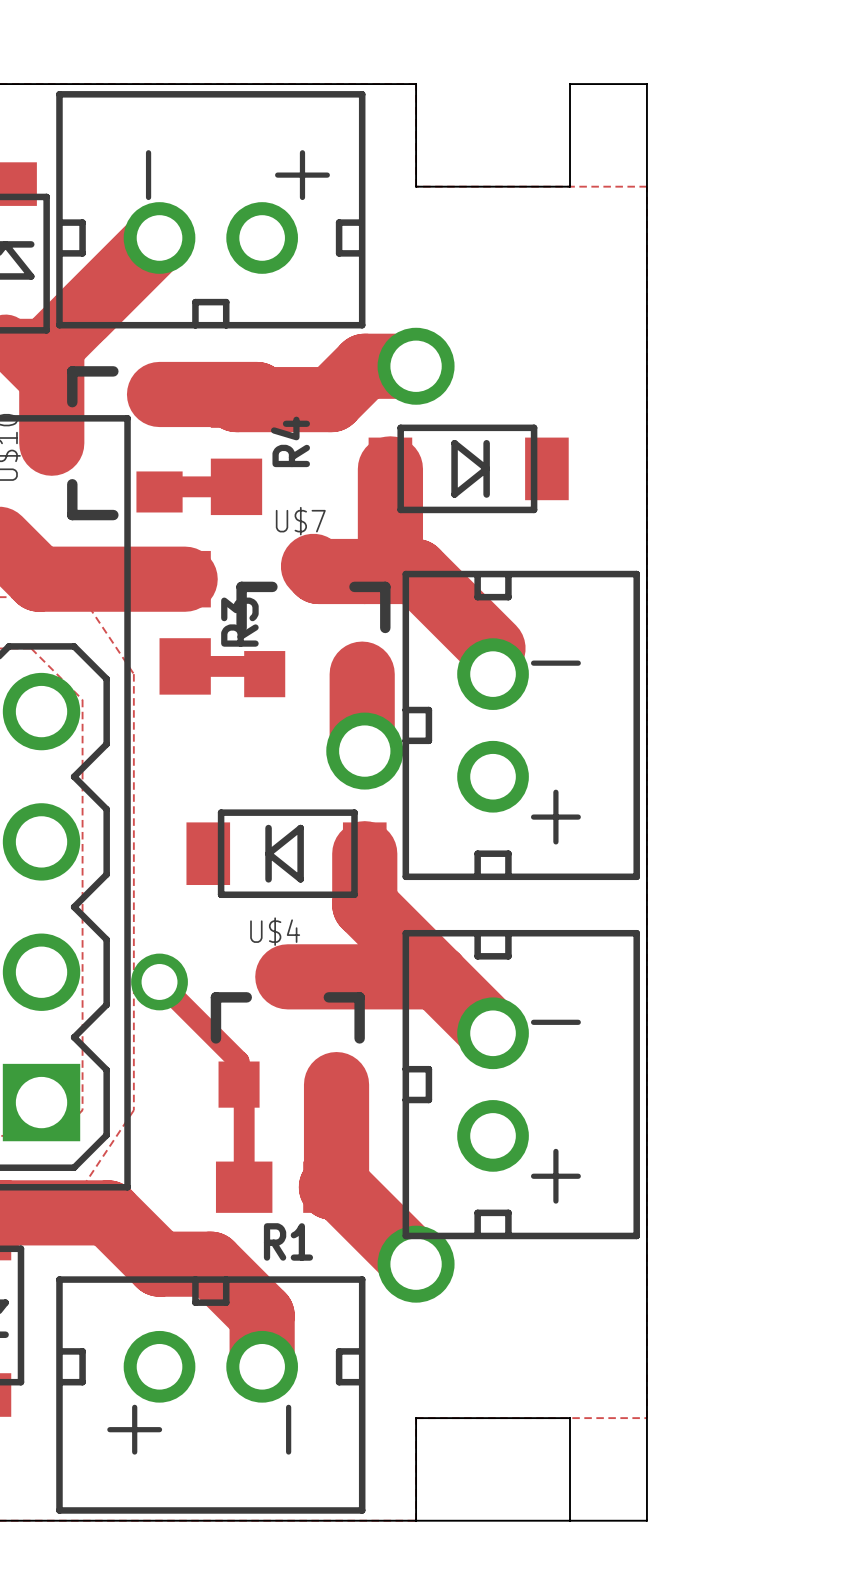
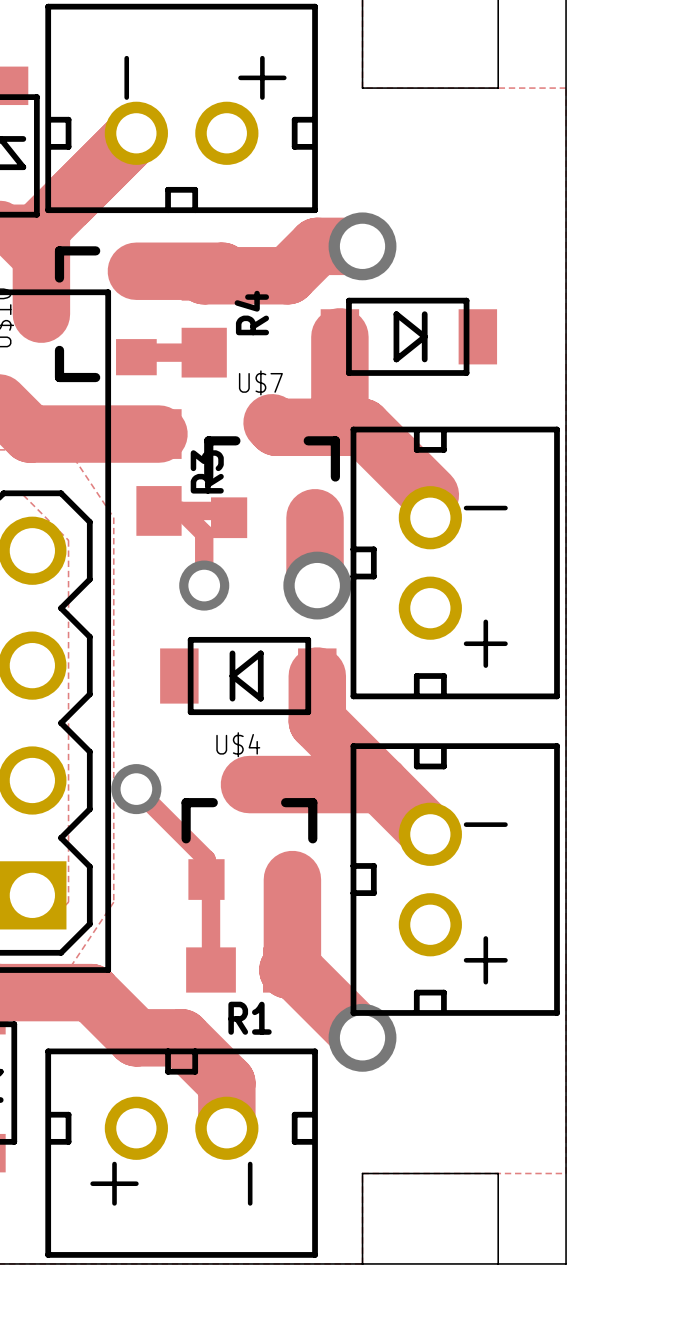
track: none -> (181, 510) (204, 533) (204, 585)
via: none -> (204, 585)

